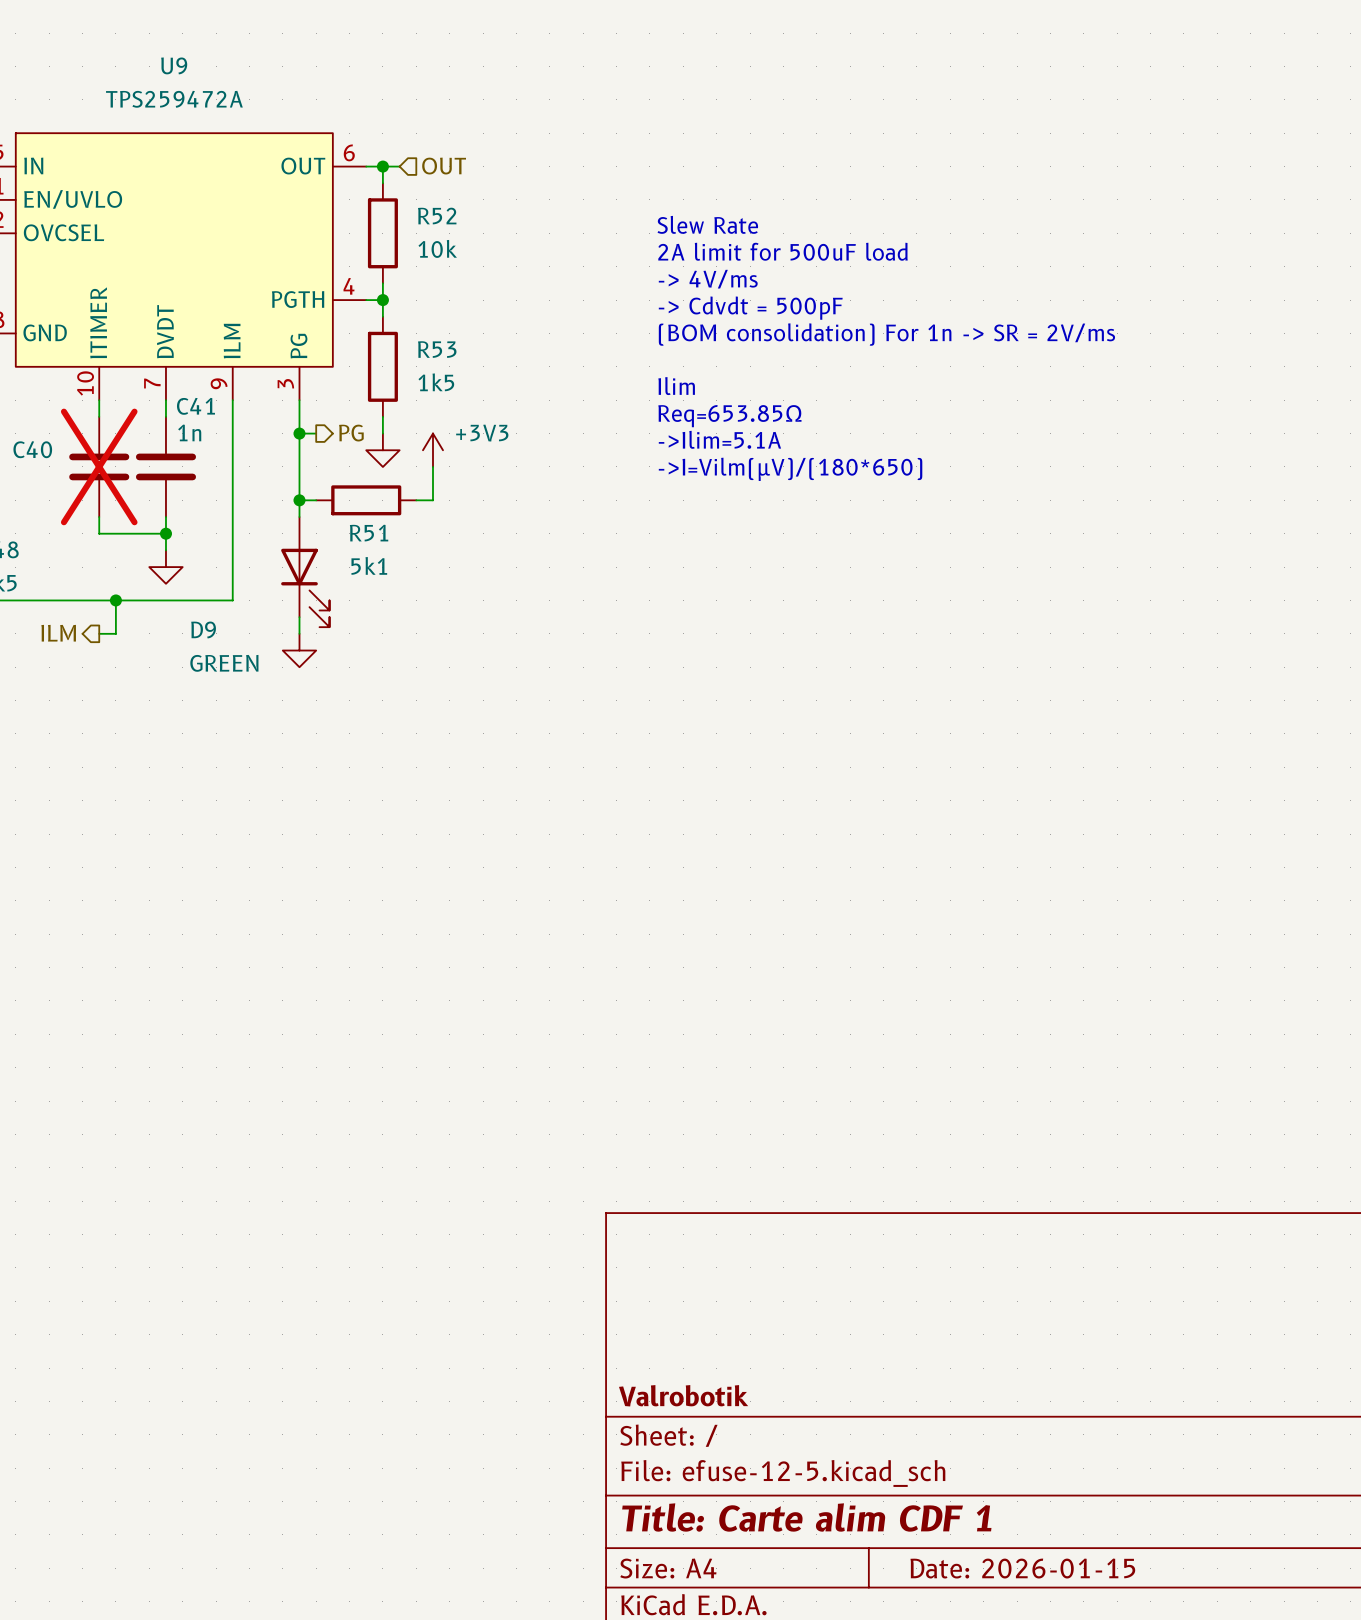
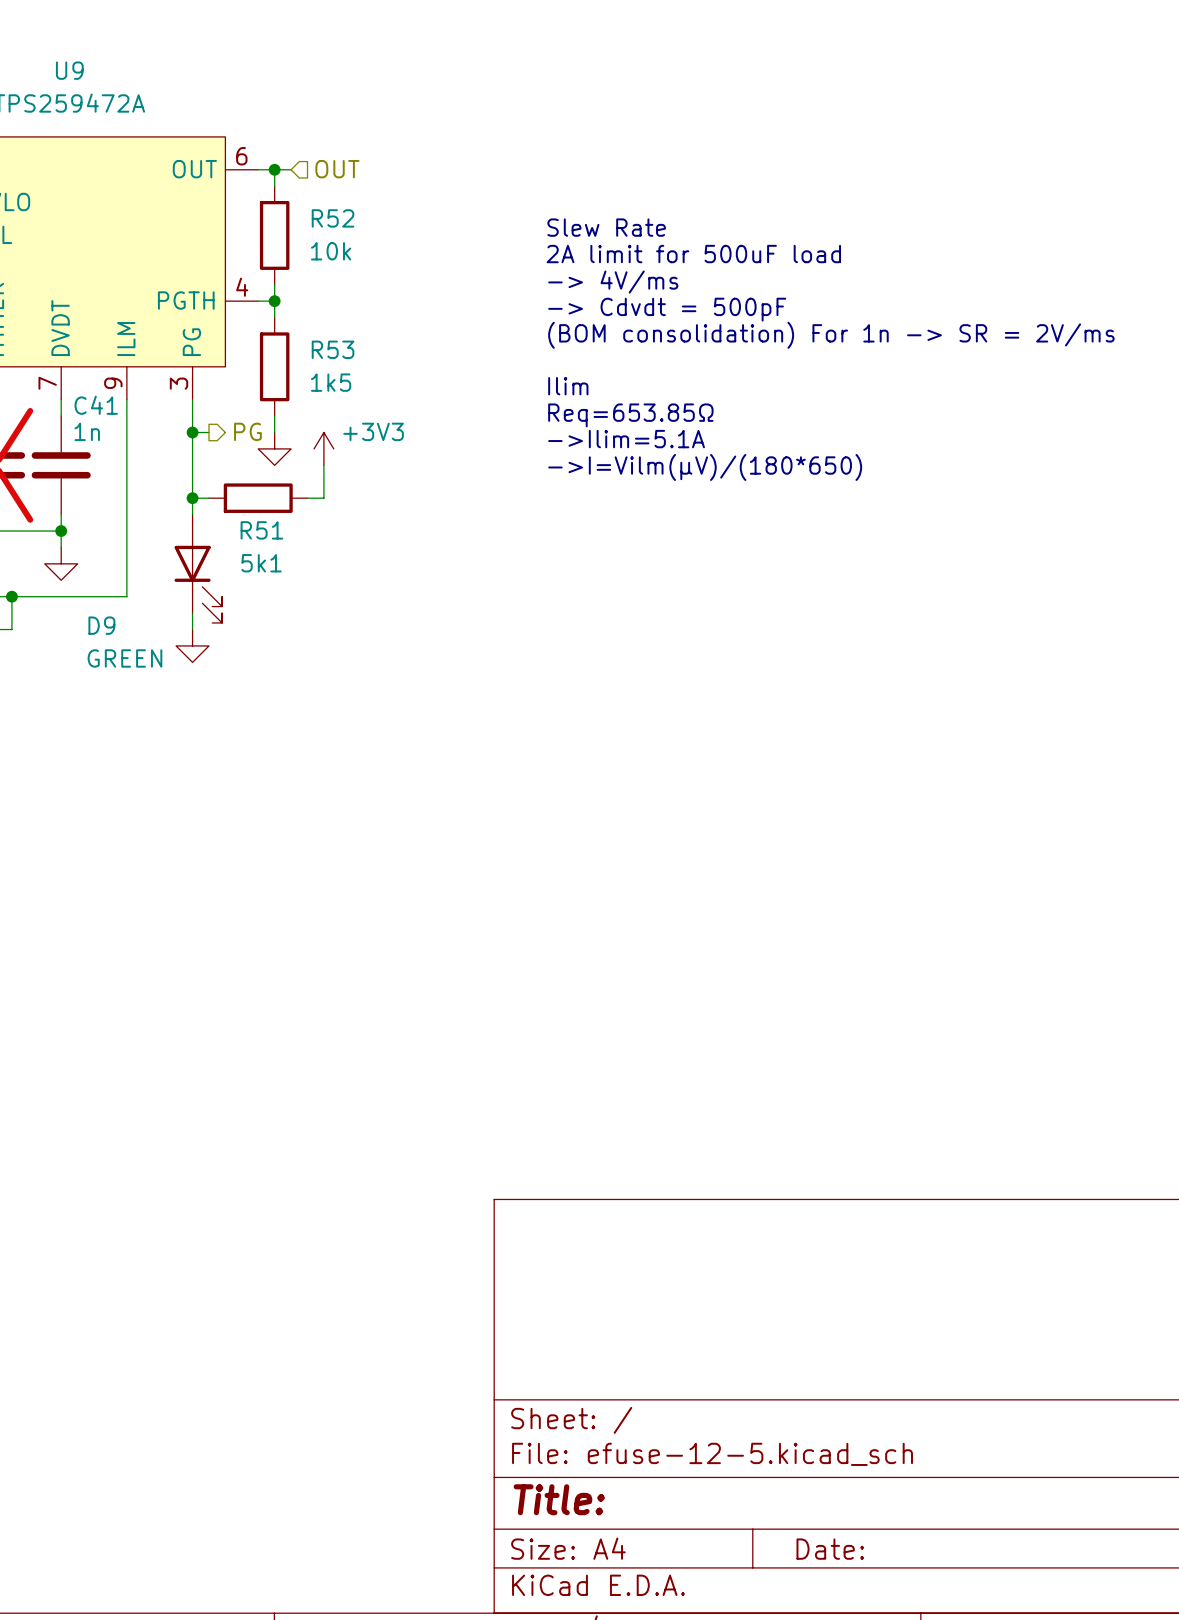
title block: Valrobotik (683, 1395) -> none
title block: Title: Carte alim CDF 1 (806, 1517) -> Title: (559, 1499)
title block: Date: 2026-01-15 (1022, 1568) -> Date: (830, 1549)

